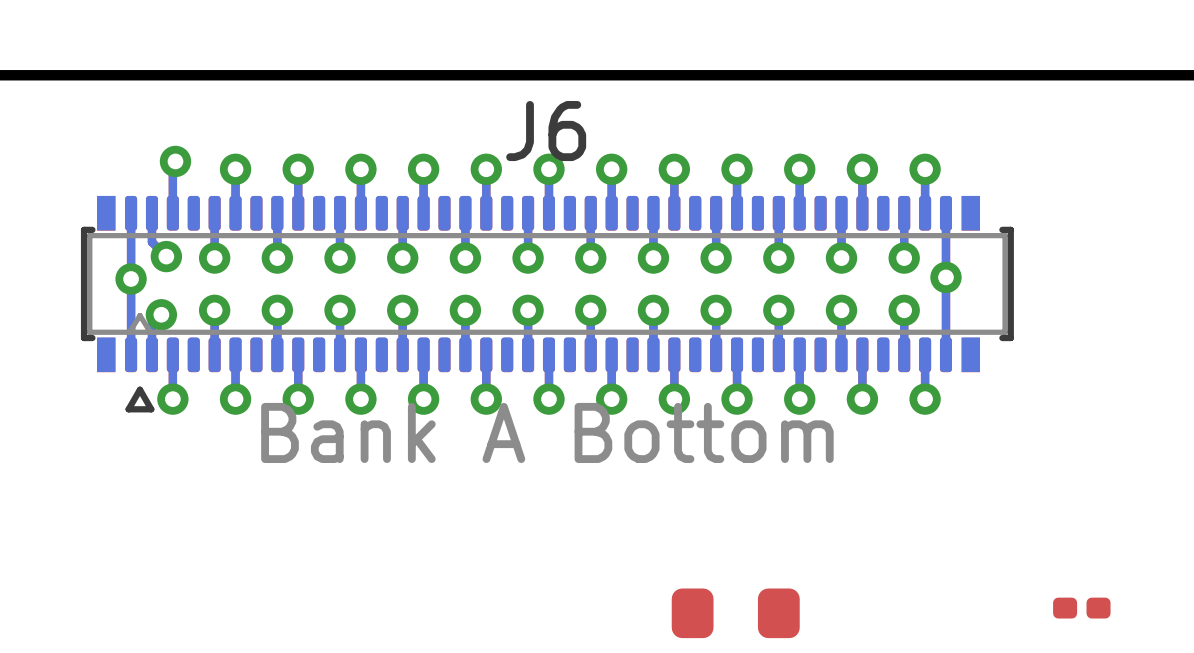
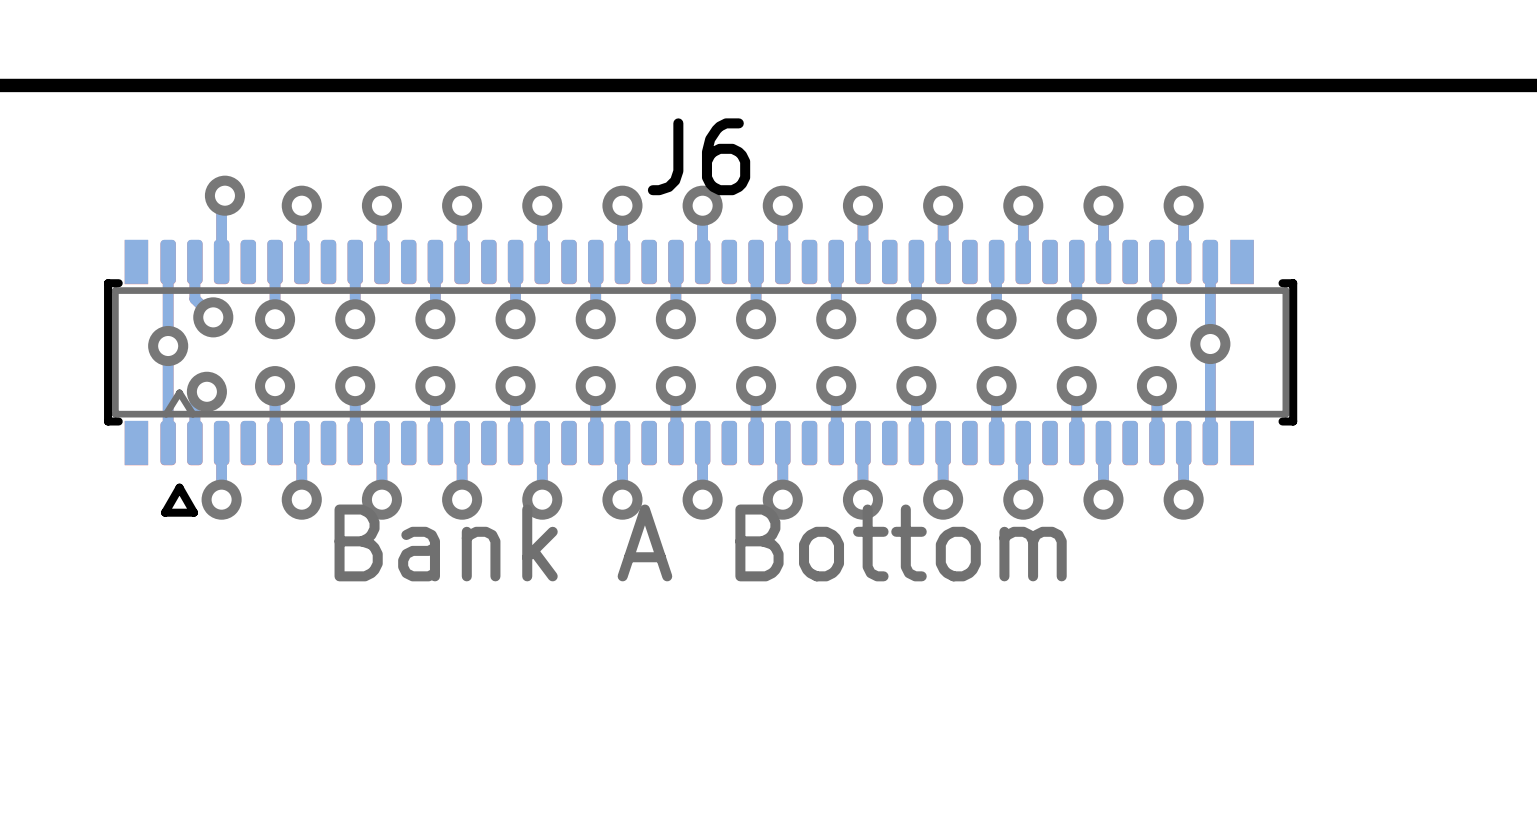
part: (1081, 608) -> none
part: (735, 613) -> none

